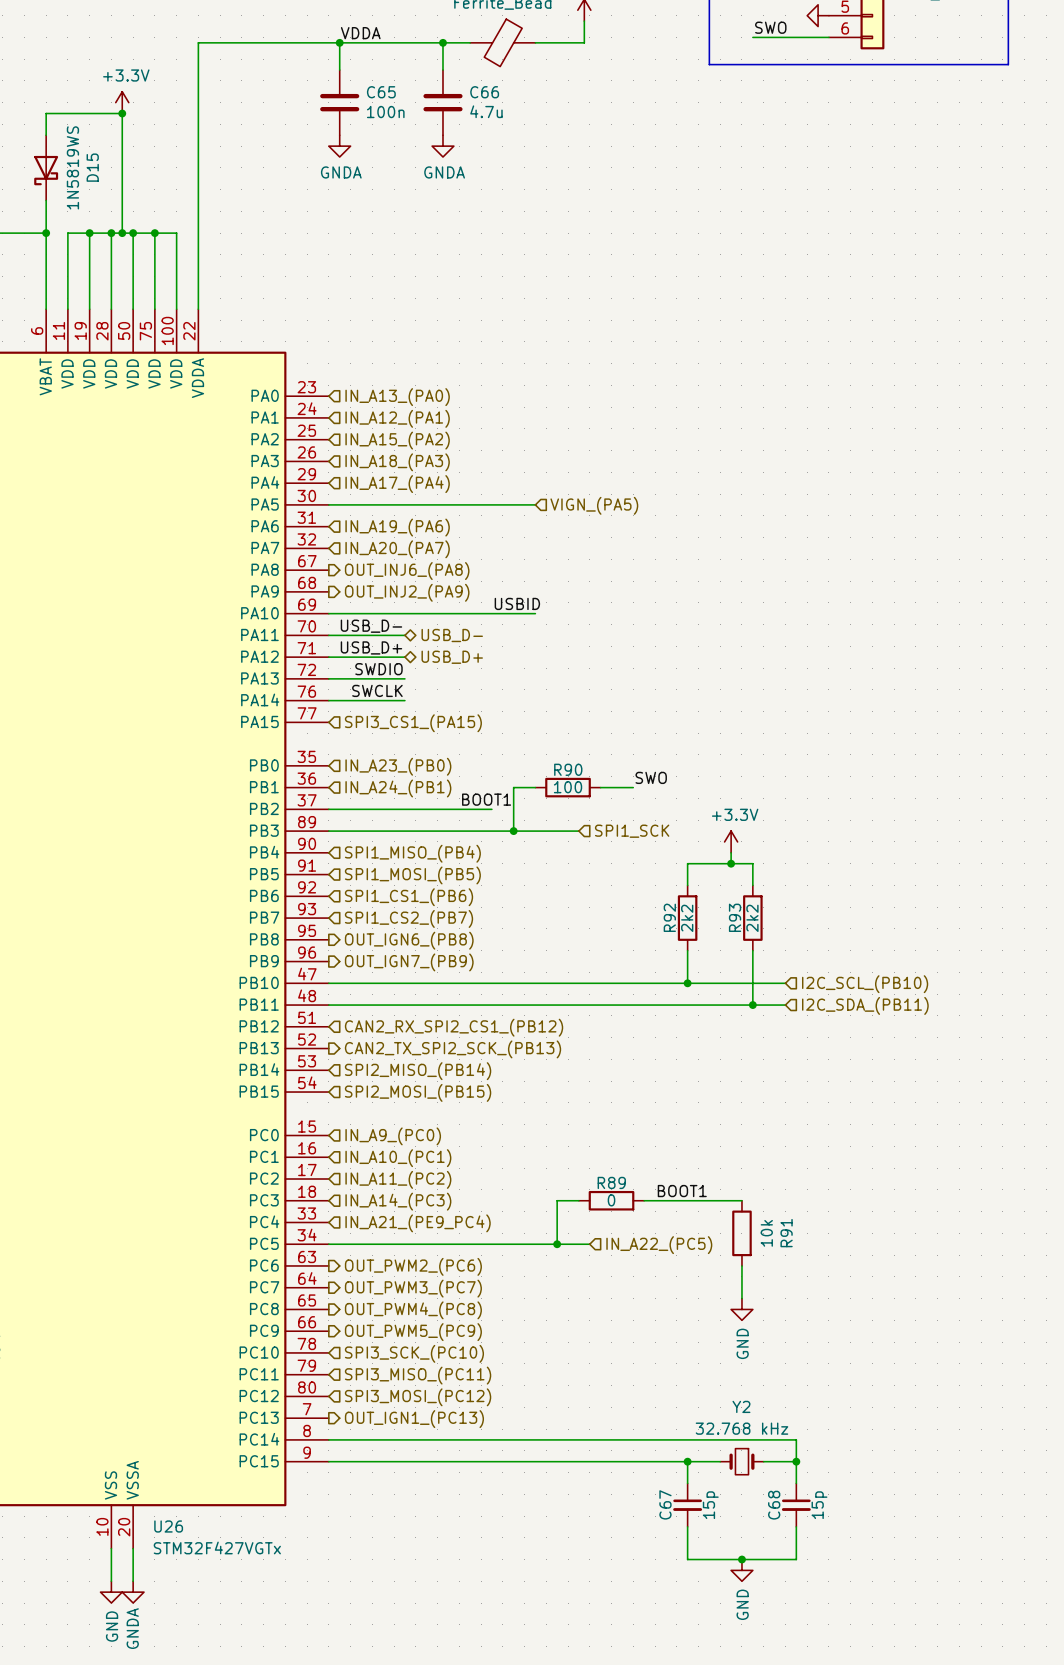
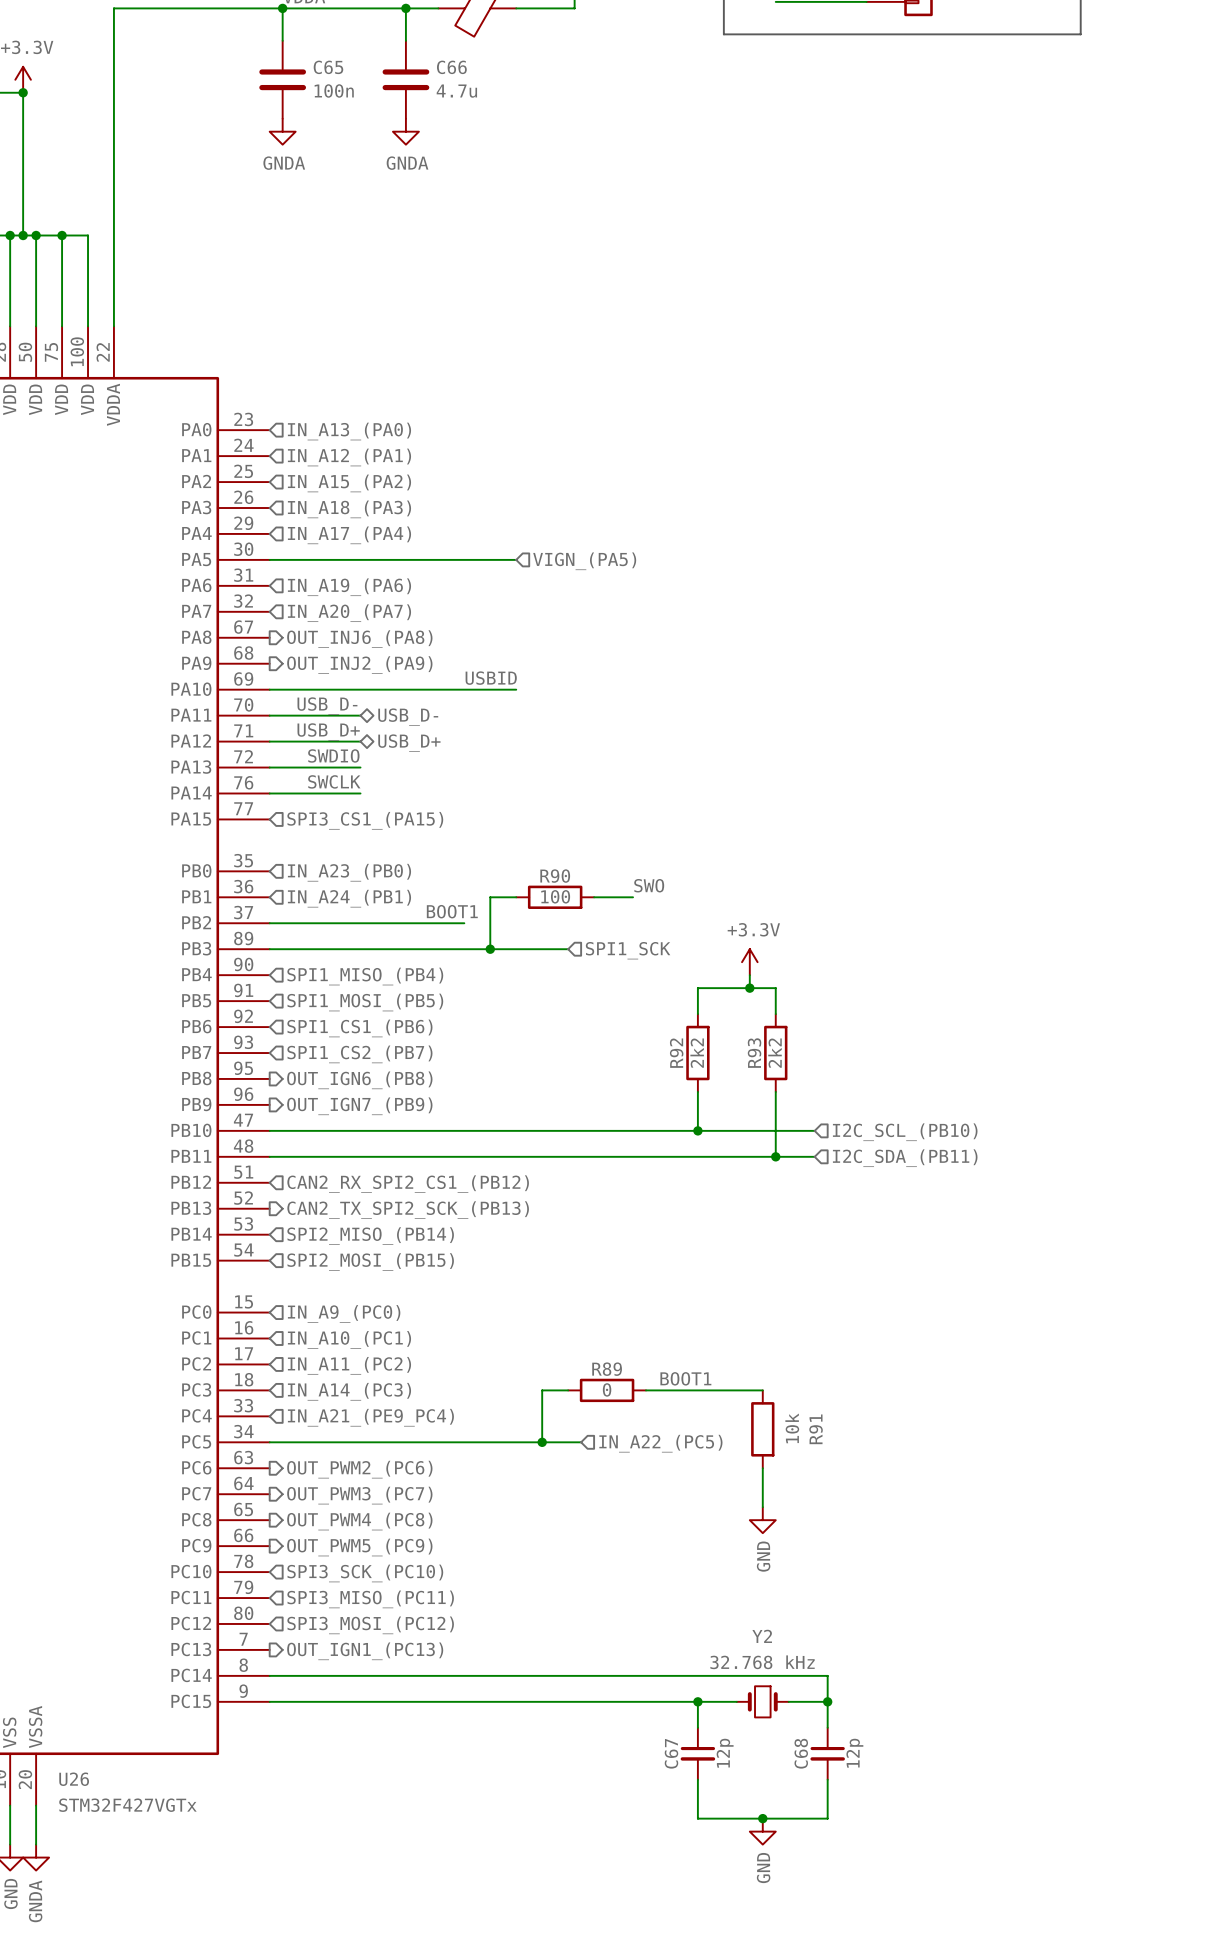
C67 value: 15p (710, 1505) -> 12p (725, 1753)
C68 value: 15p (819, 1505) -> 12p (854, 1753)

